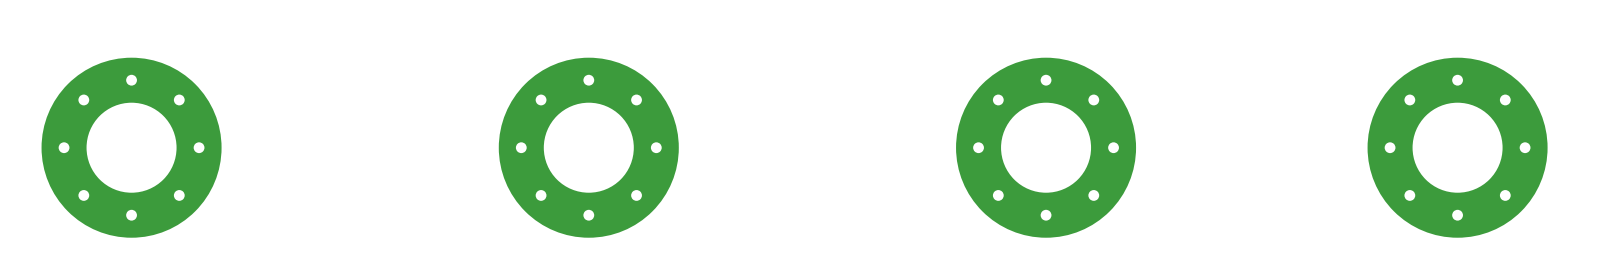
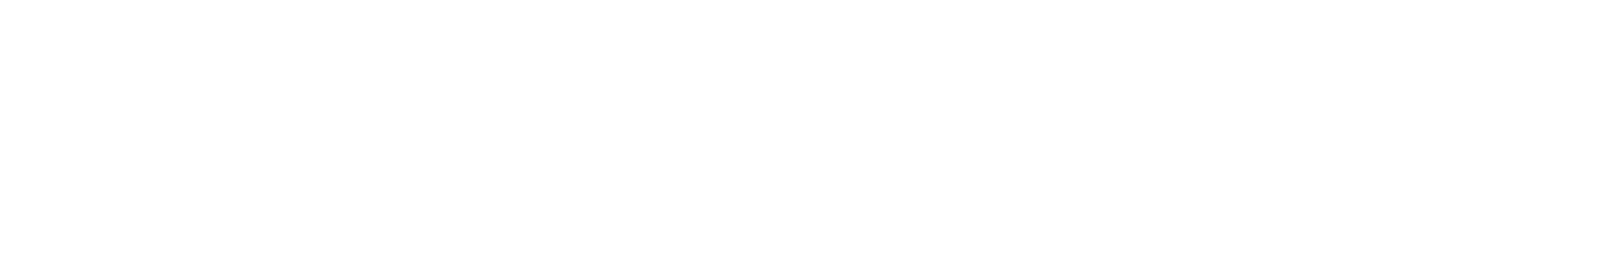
part: (131, 147) -> none
part: (588, 147) -> none
part: (1046, 147) -> none
part: (1457, 147) -> none

